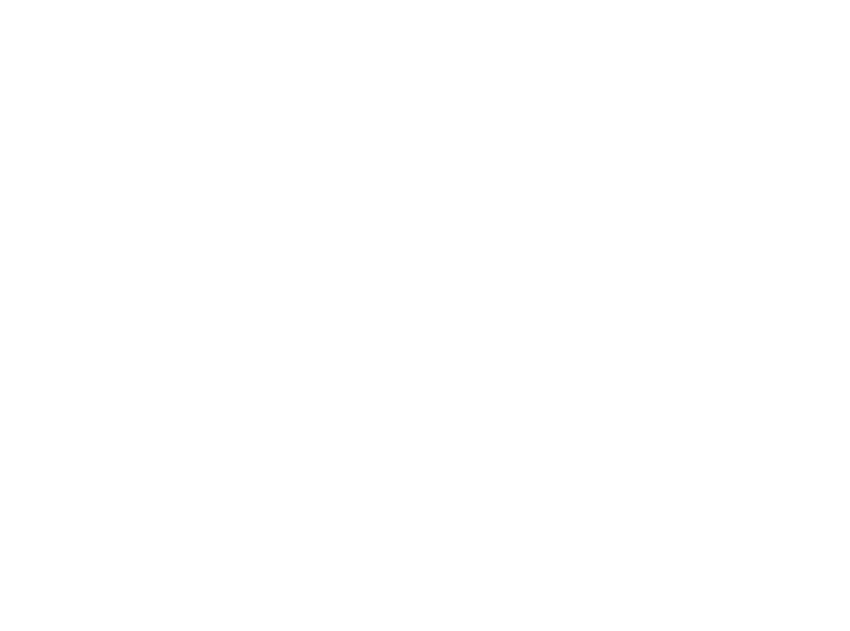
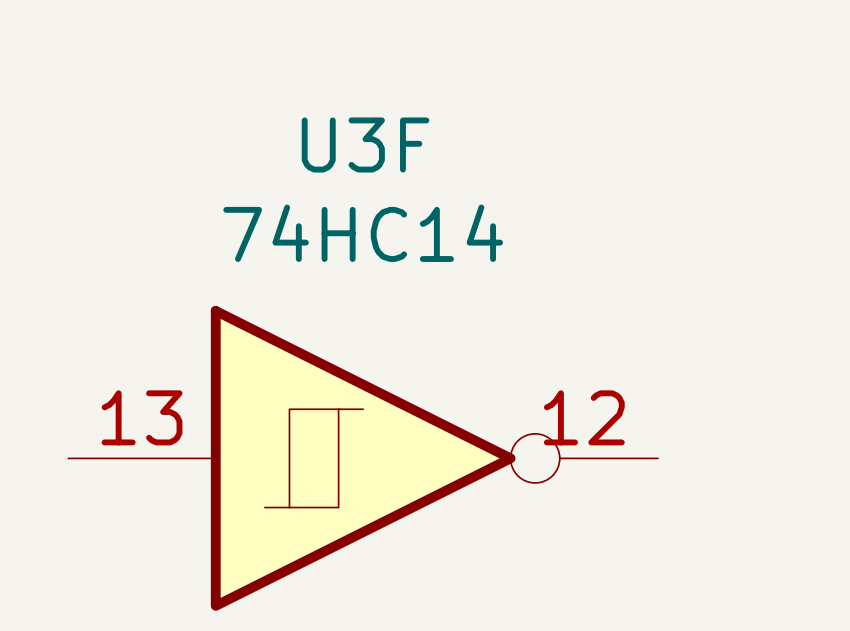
U3F: none -> 74HC14 (363, 458)

